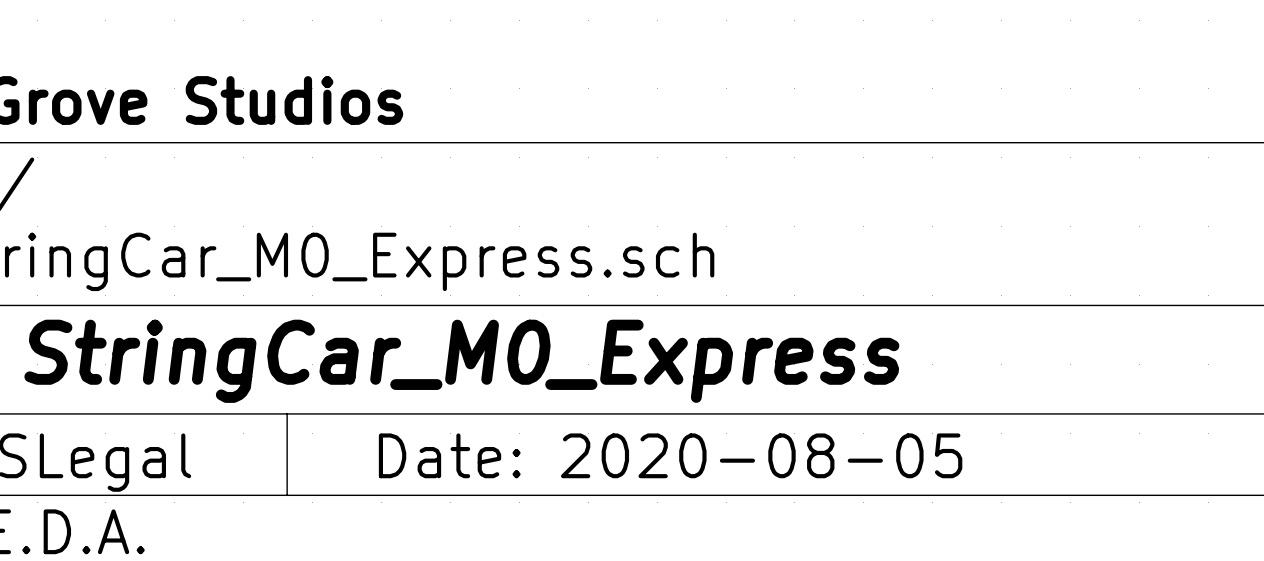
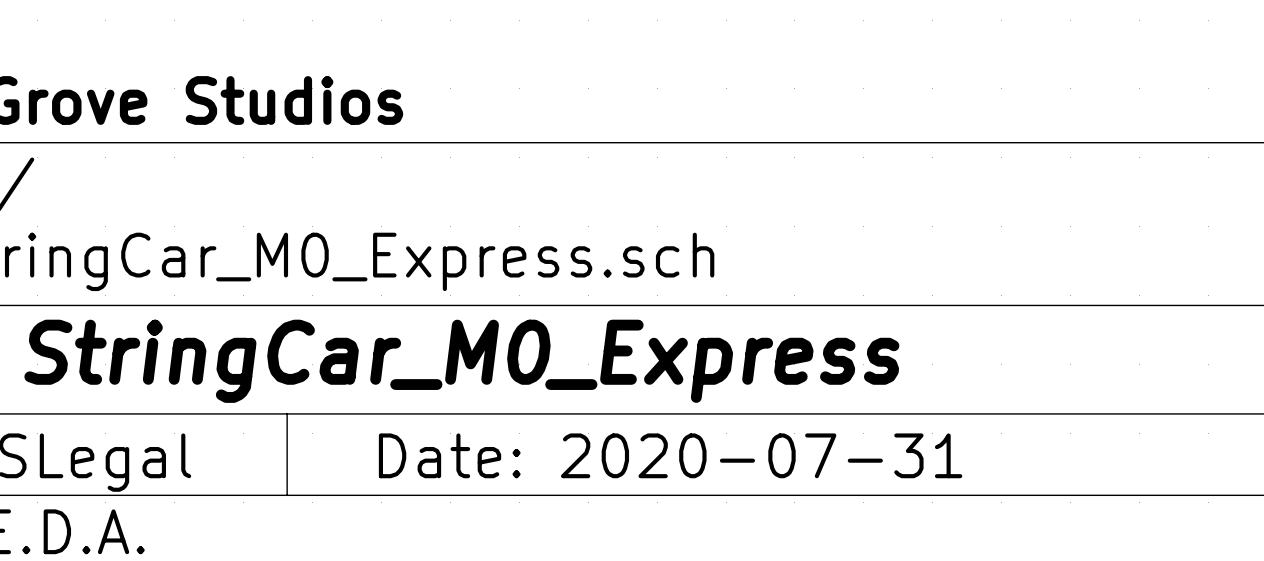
title block: Date: 2020-08-05 (670, 455) -> Date: 2020-07-31 (670, 455)

